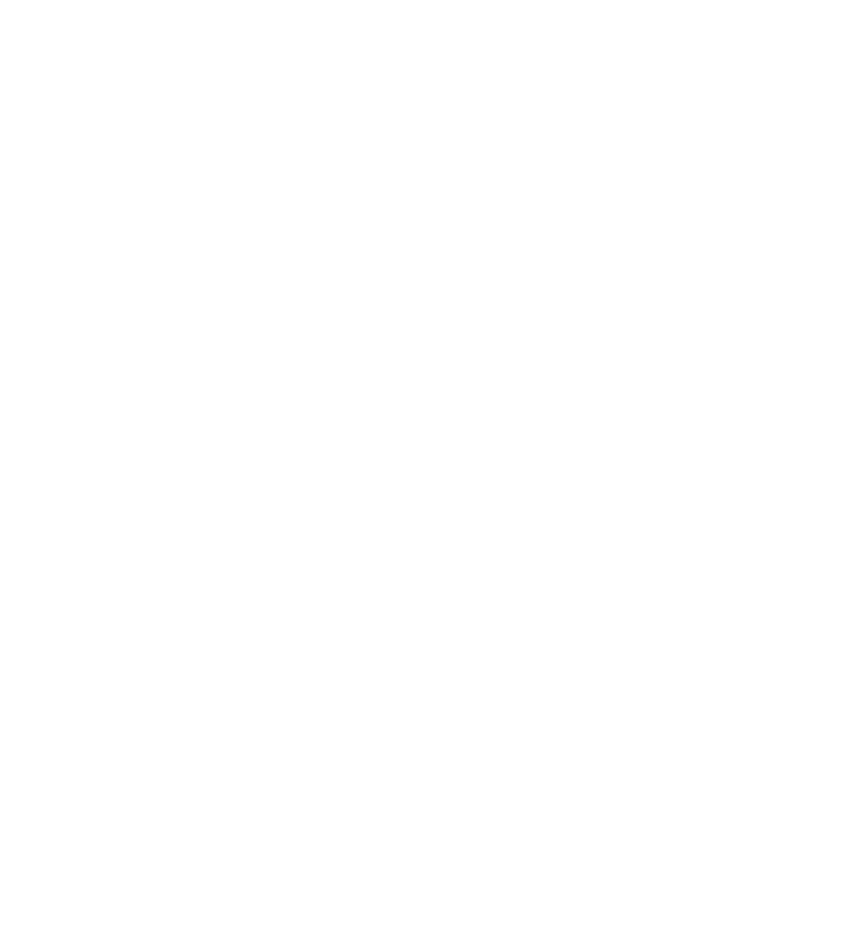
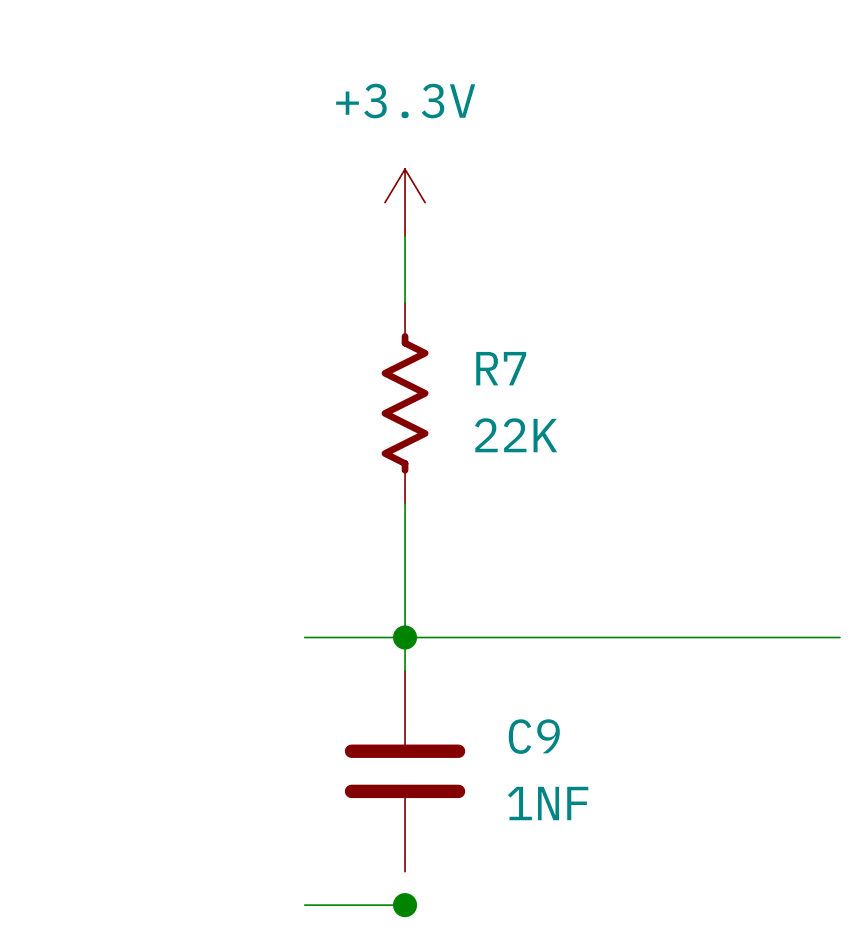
power symbol: none -> +3.3V (405, 202)
wire: none -> (405, 236) (405, 302)
R7: none -> 22K (405, 403)
wire: none -> (405, 503) (405, 670)
wire: none -> (304, 637) (839, 637)
junction: none -> (405, 637)
C9: none -> 1NF (405, 771)
wire: none -> (304, 905) (405, 905)
junction: none -> (405, 905)

